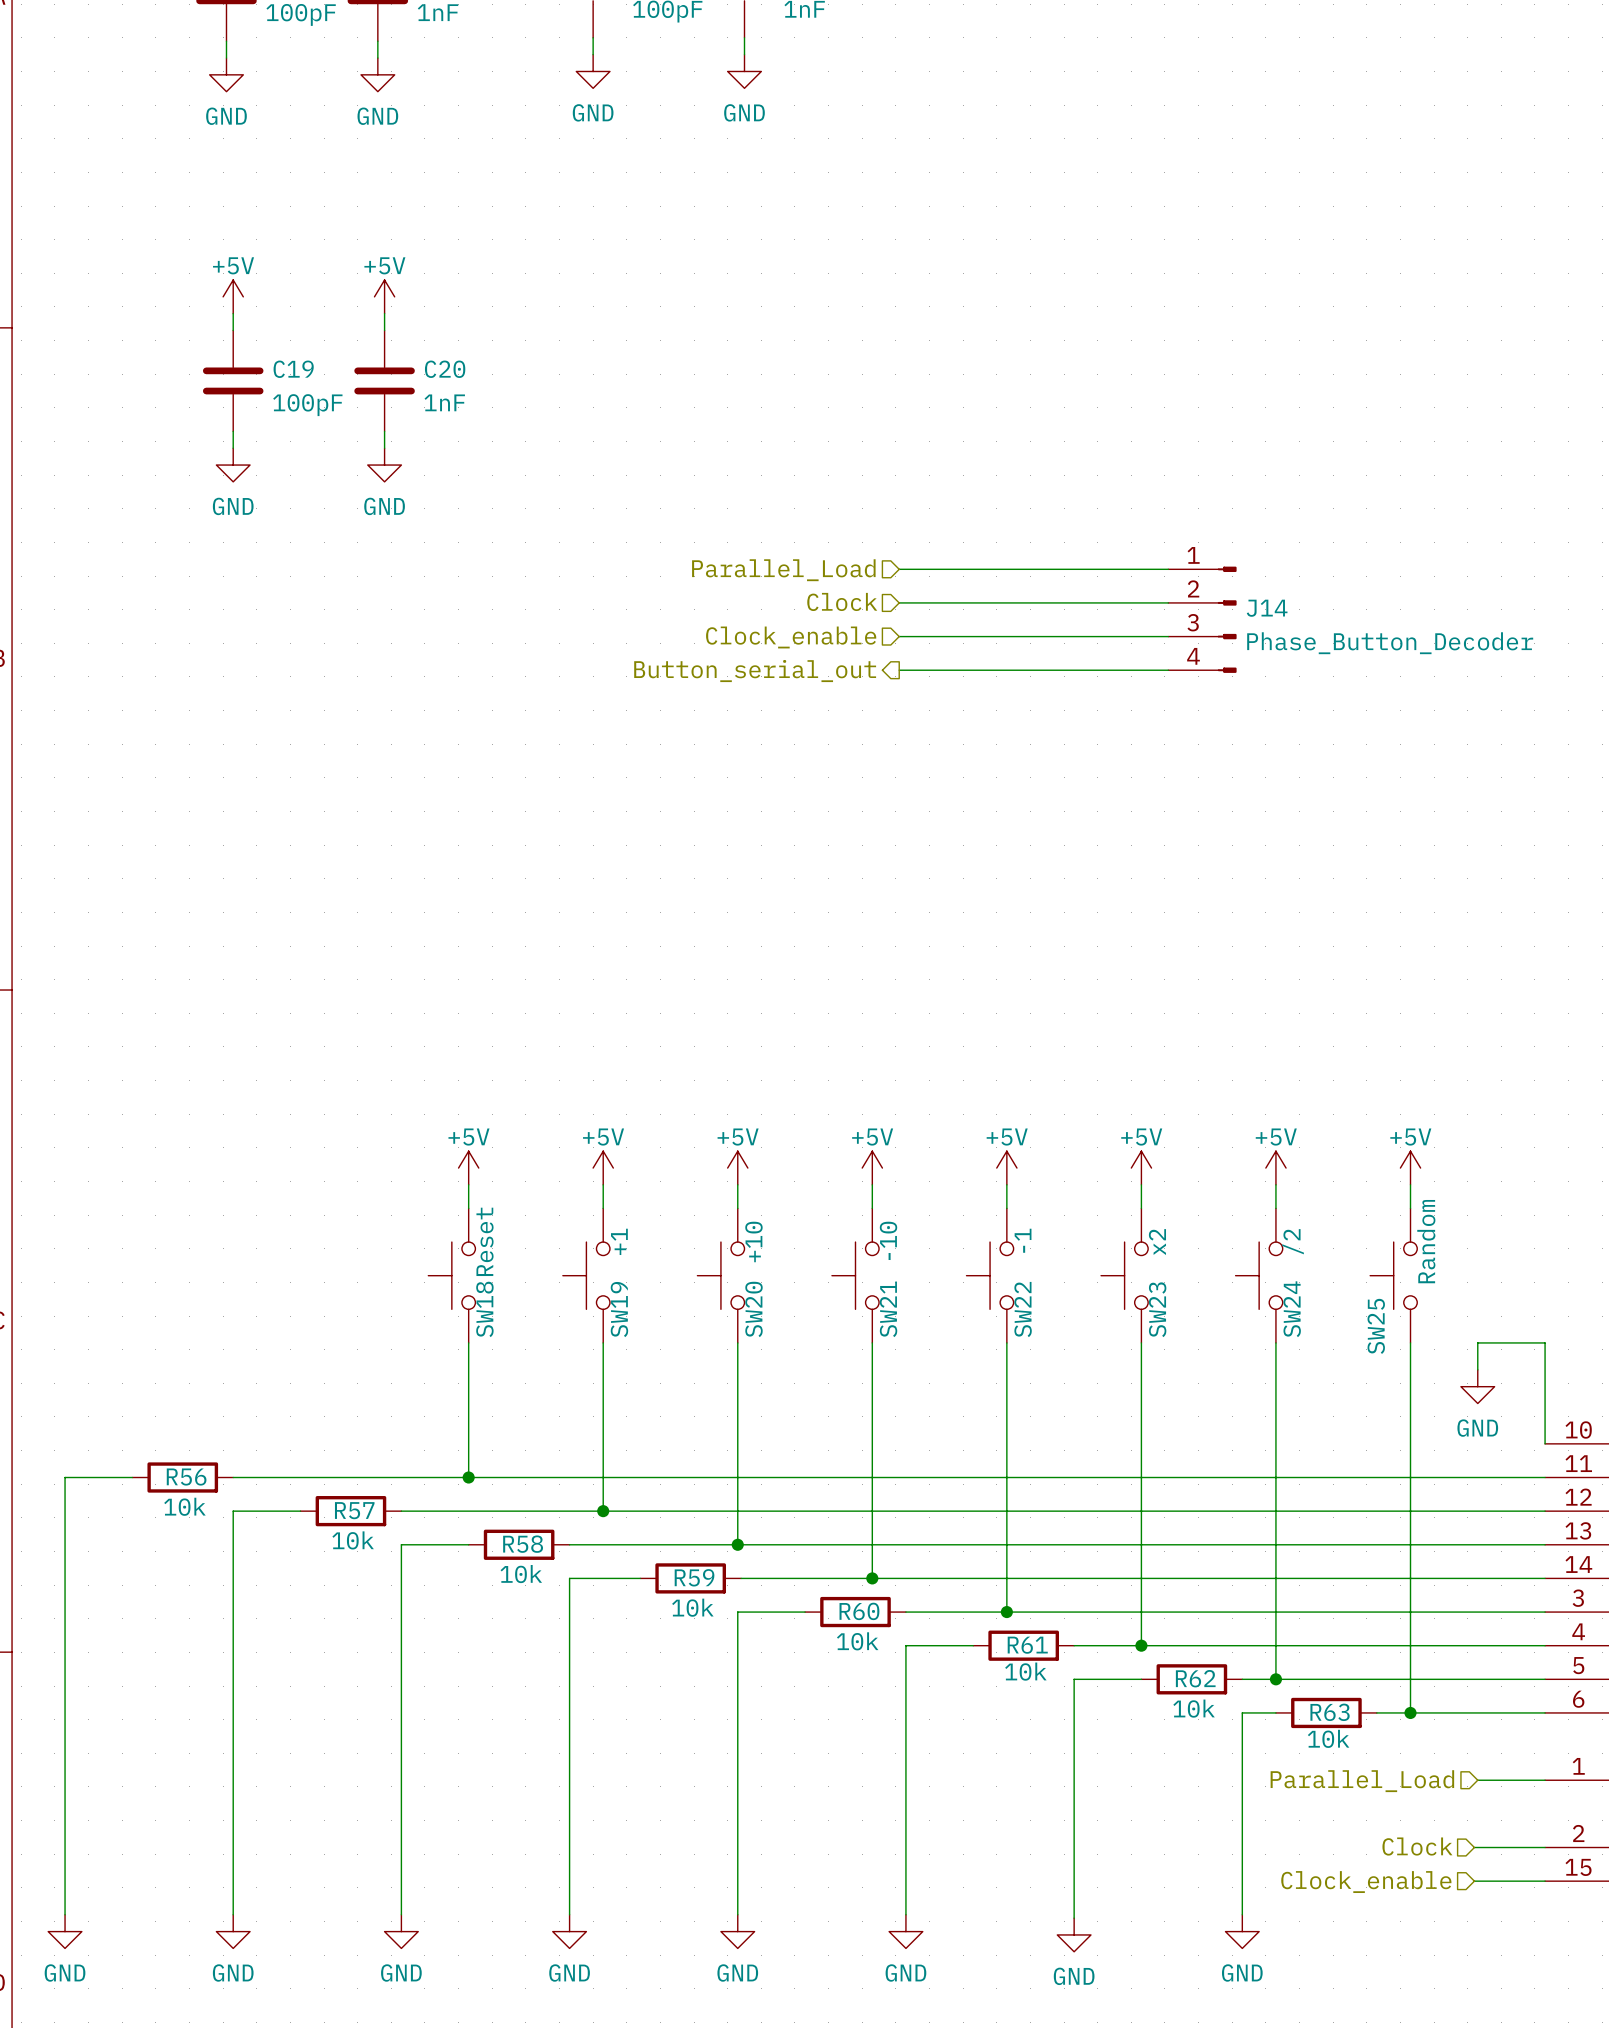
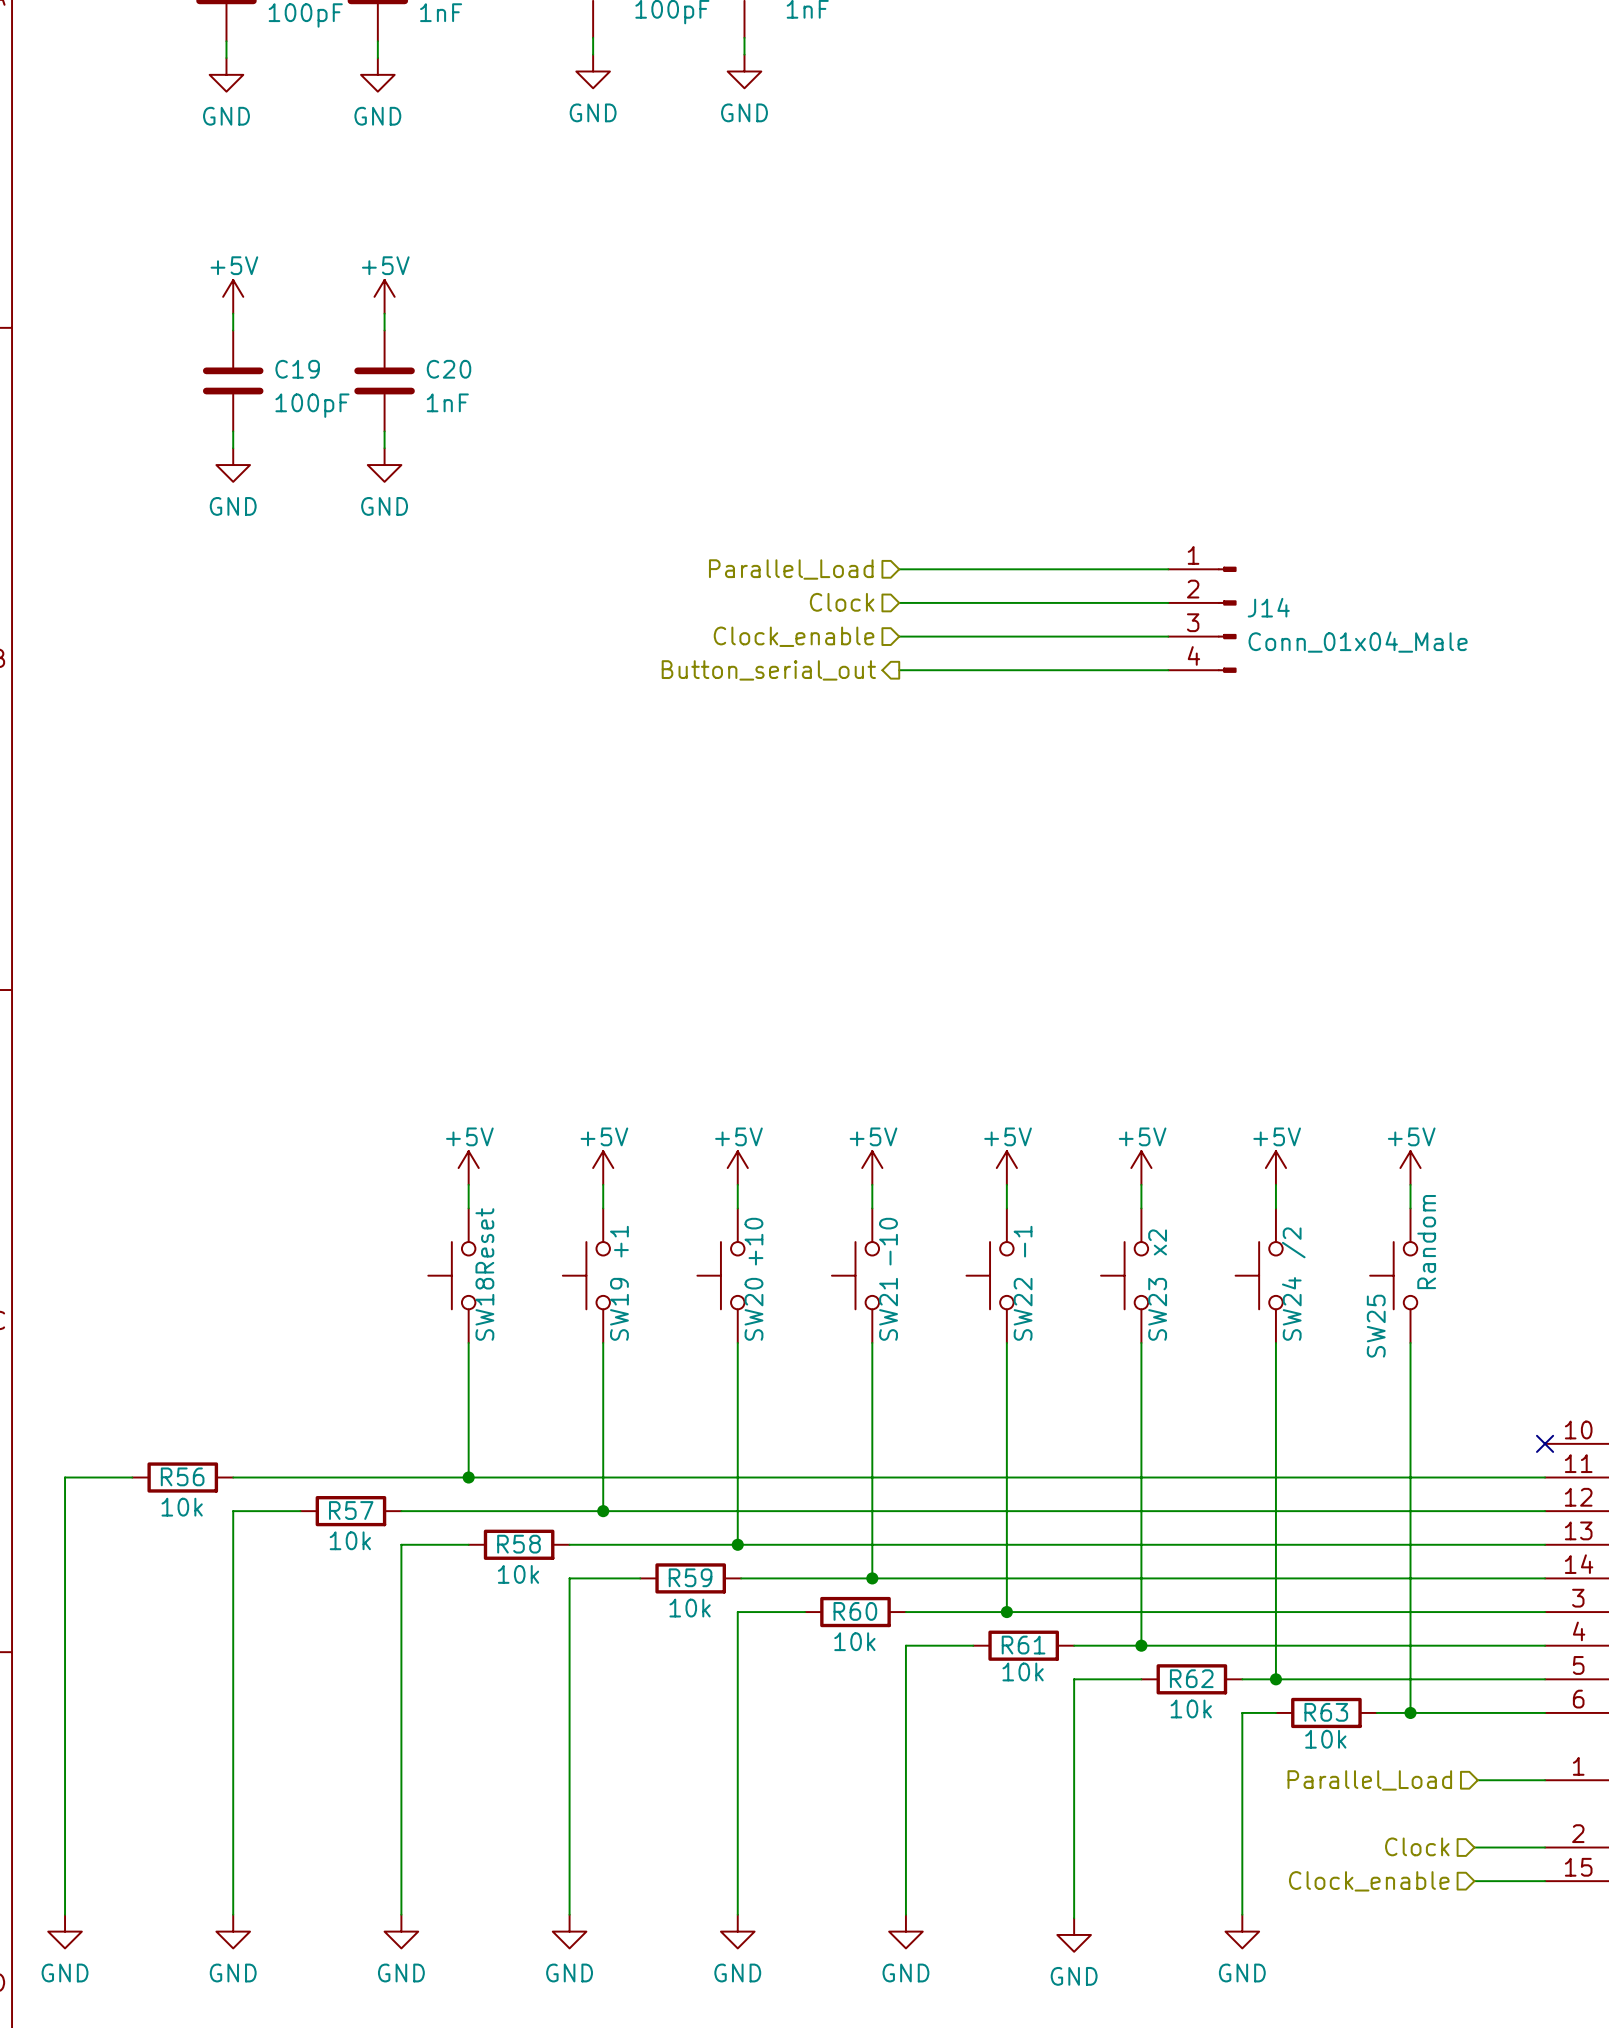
J14 value: Phase_Button_Decoder (1390, 643) -> Conn_01x04_Male (1358, 642)
wire: (1477, 1369) (1477, 1342) (1545, 1342) (1545, 1443) -> none
power symbol: GND (1477, 1386) -> none
no-connect mark: none -> (1545, 1443)

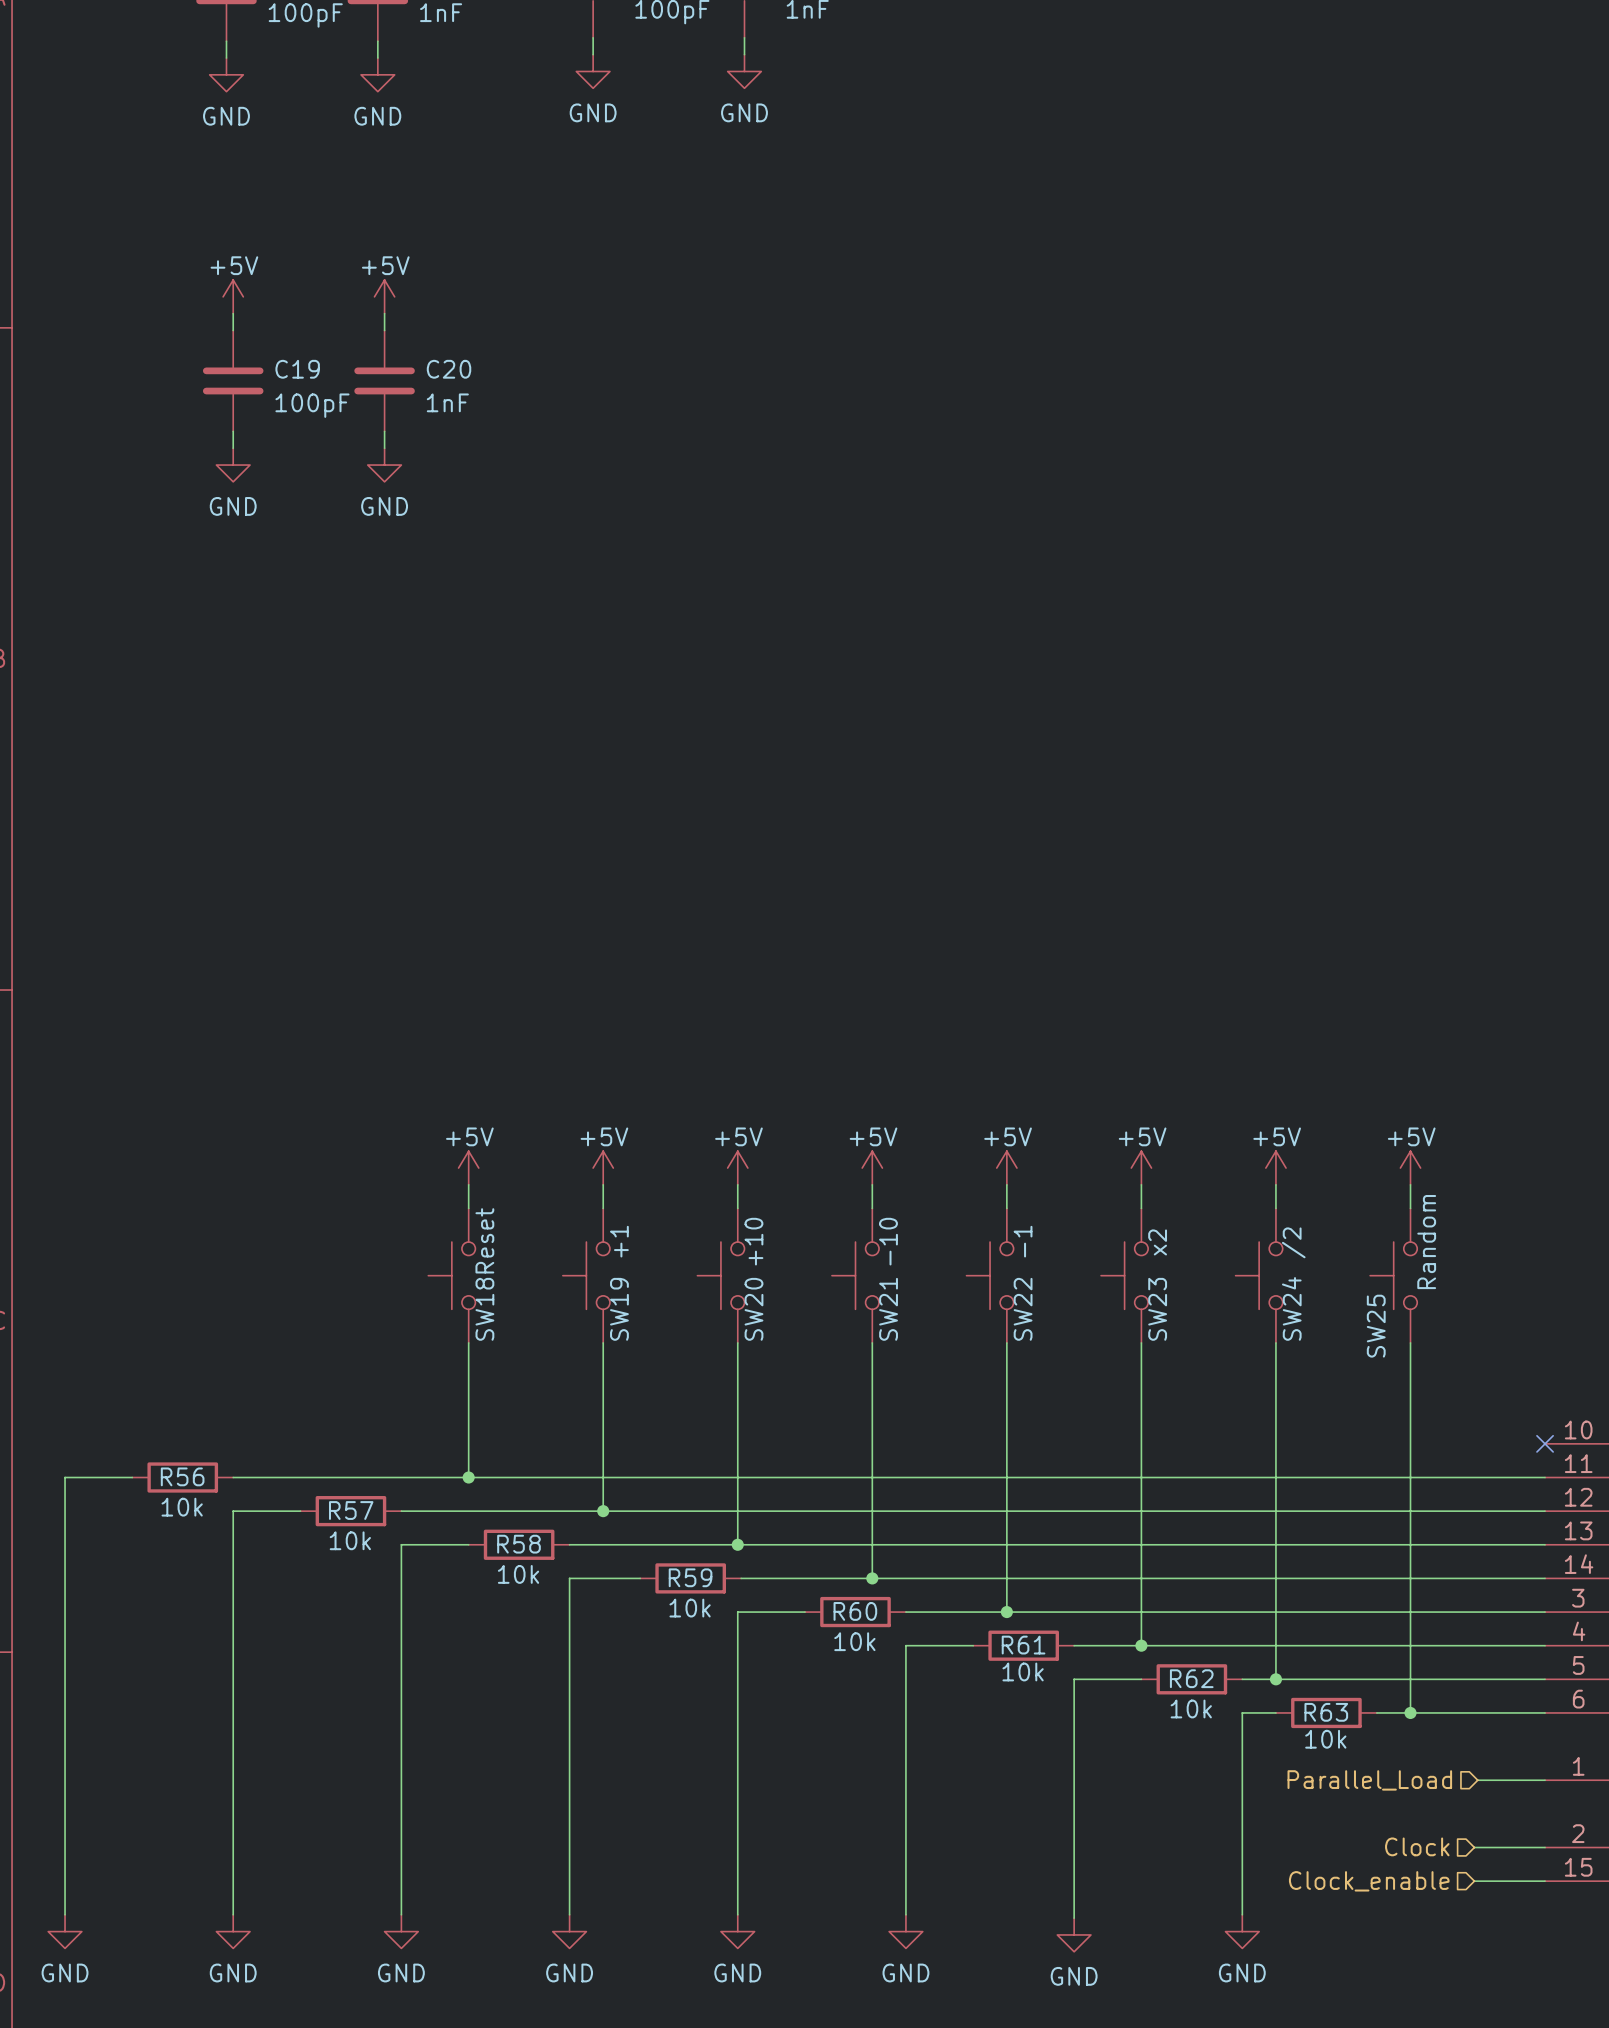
hierarchical label: Parallel_Load (791, 569) -> none
wire: (899, 569) (1168, 569) -> none
hierarchical label: Clock (842, 602) -> none
wire: (899, 602) (1168, 602) -> none
J14: Conn_01x04_Male (1202, 619) -> none
hierarchical label: Clock_enable (794, 636) -> none
wire: (899, 636) (1168, 636) -> none
hierarchical label: Button_serial_out (768, 670) -> none
wire: (899, 670) (1168, 670) -> none

